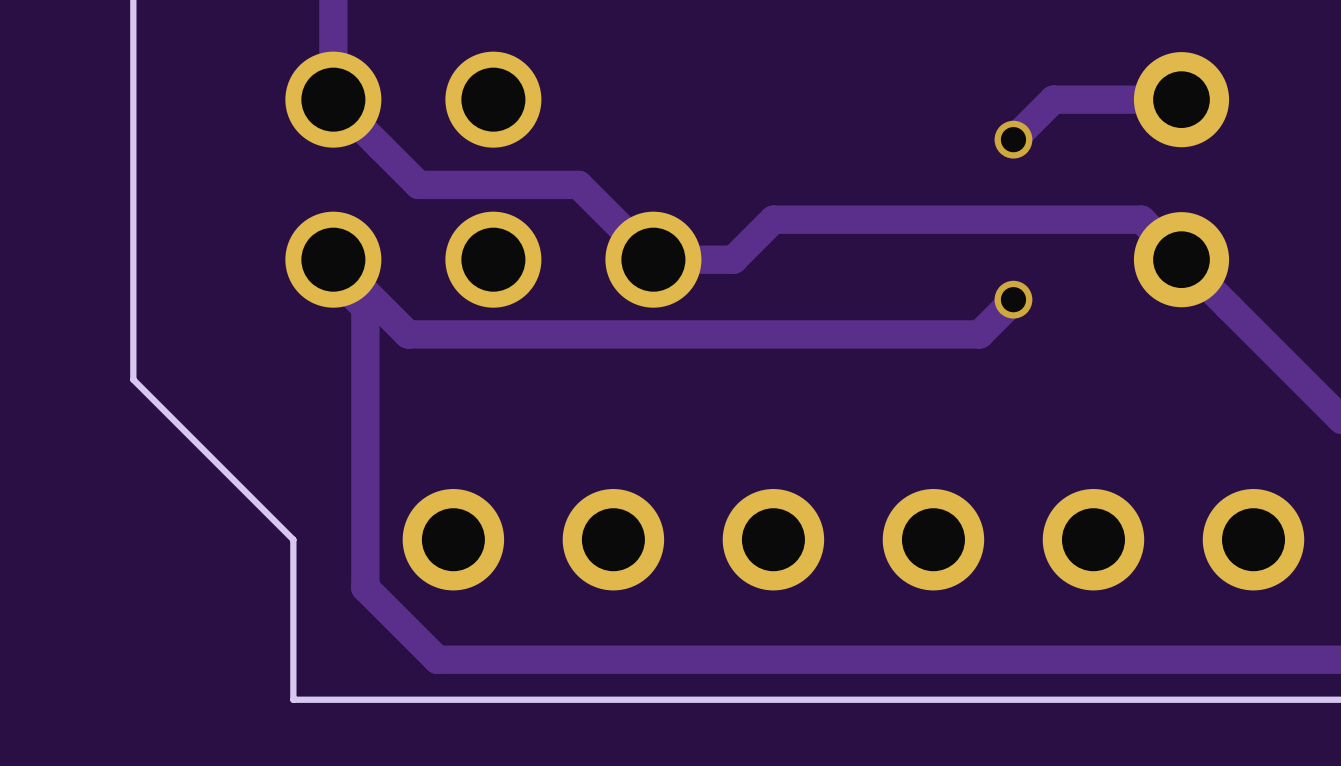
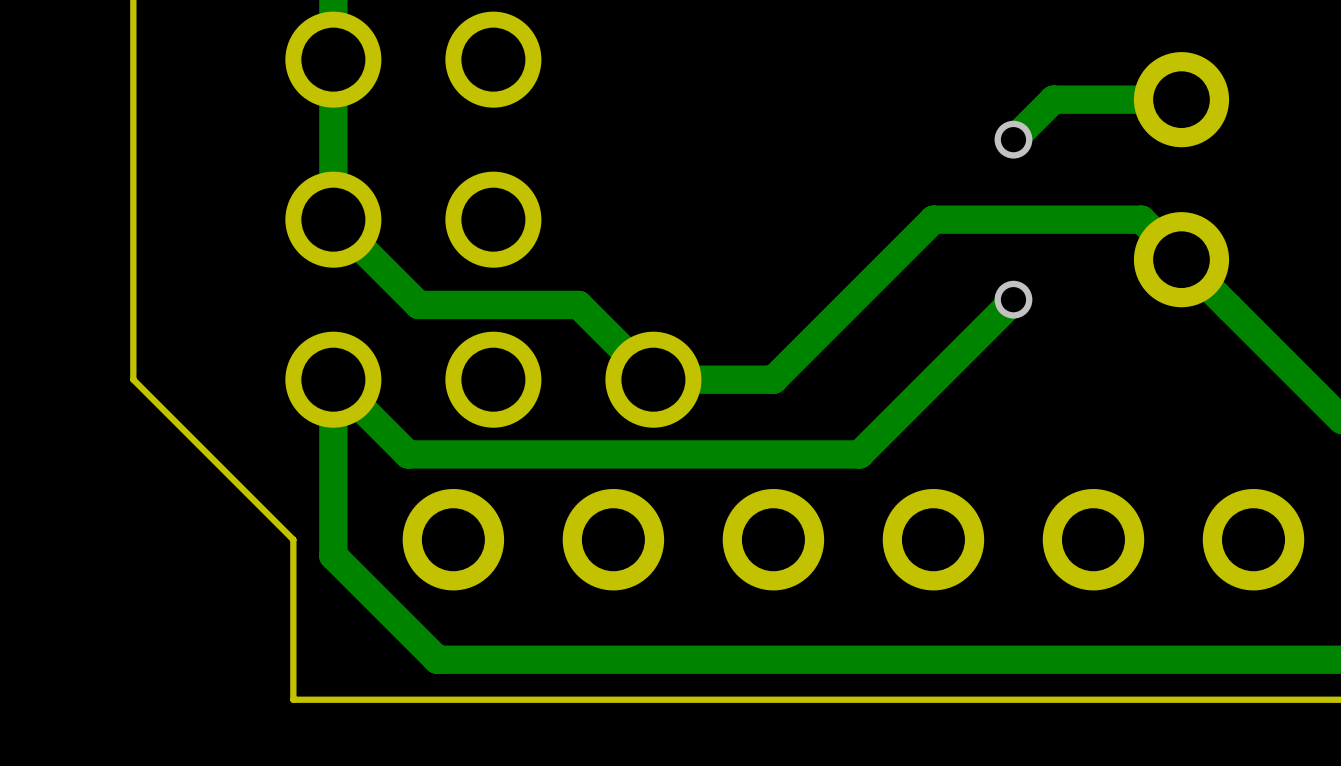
track: (333, 99) (418, 184) (578, 184) (653, 259) (733, 259) (773, 219) (933, 219) -> (333, 99) (333, 219) (418, 304) (578, 304) (653, 379) (773, 379) (933, 219)
part position: (413, 99) -> (413, 59)
part: none -> (413, 219)
part position: (493, 259) -> (493, 379)
track: (979, 334) (408, 334) (333, 259) (333, 275) (365, 307) (365, 587) -> (979, 334) (859, 454) (408, 454) (333, 379) (333, 555) (365, 587)

